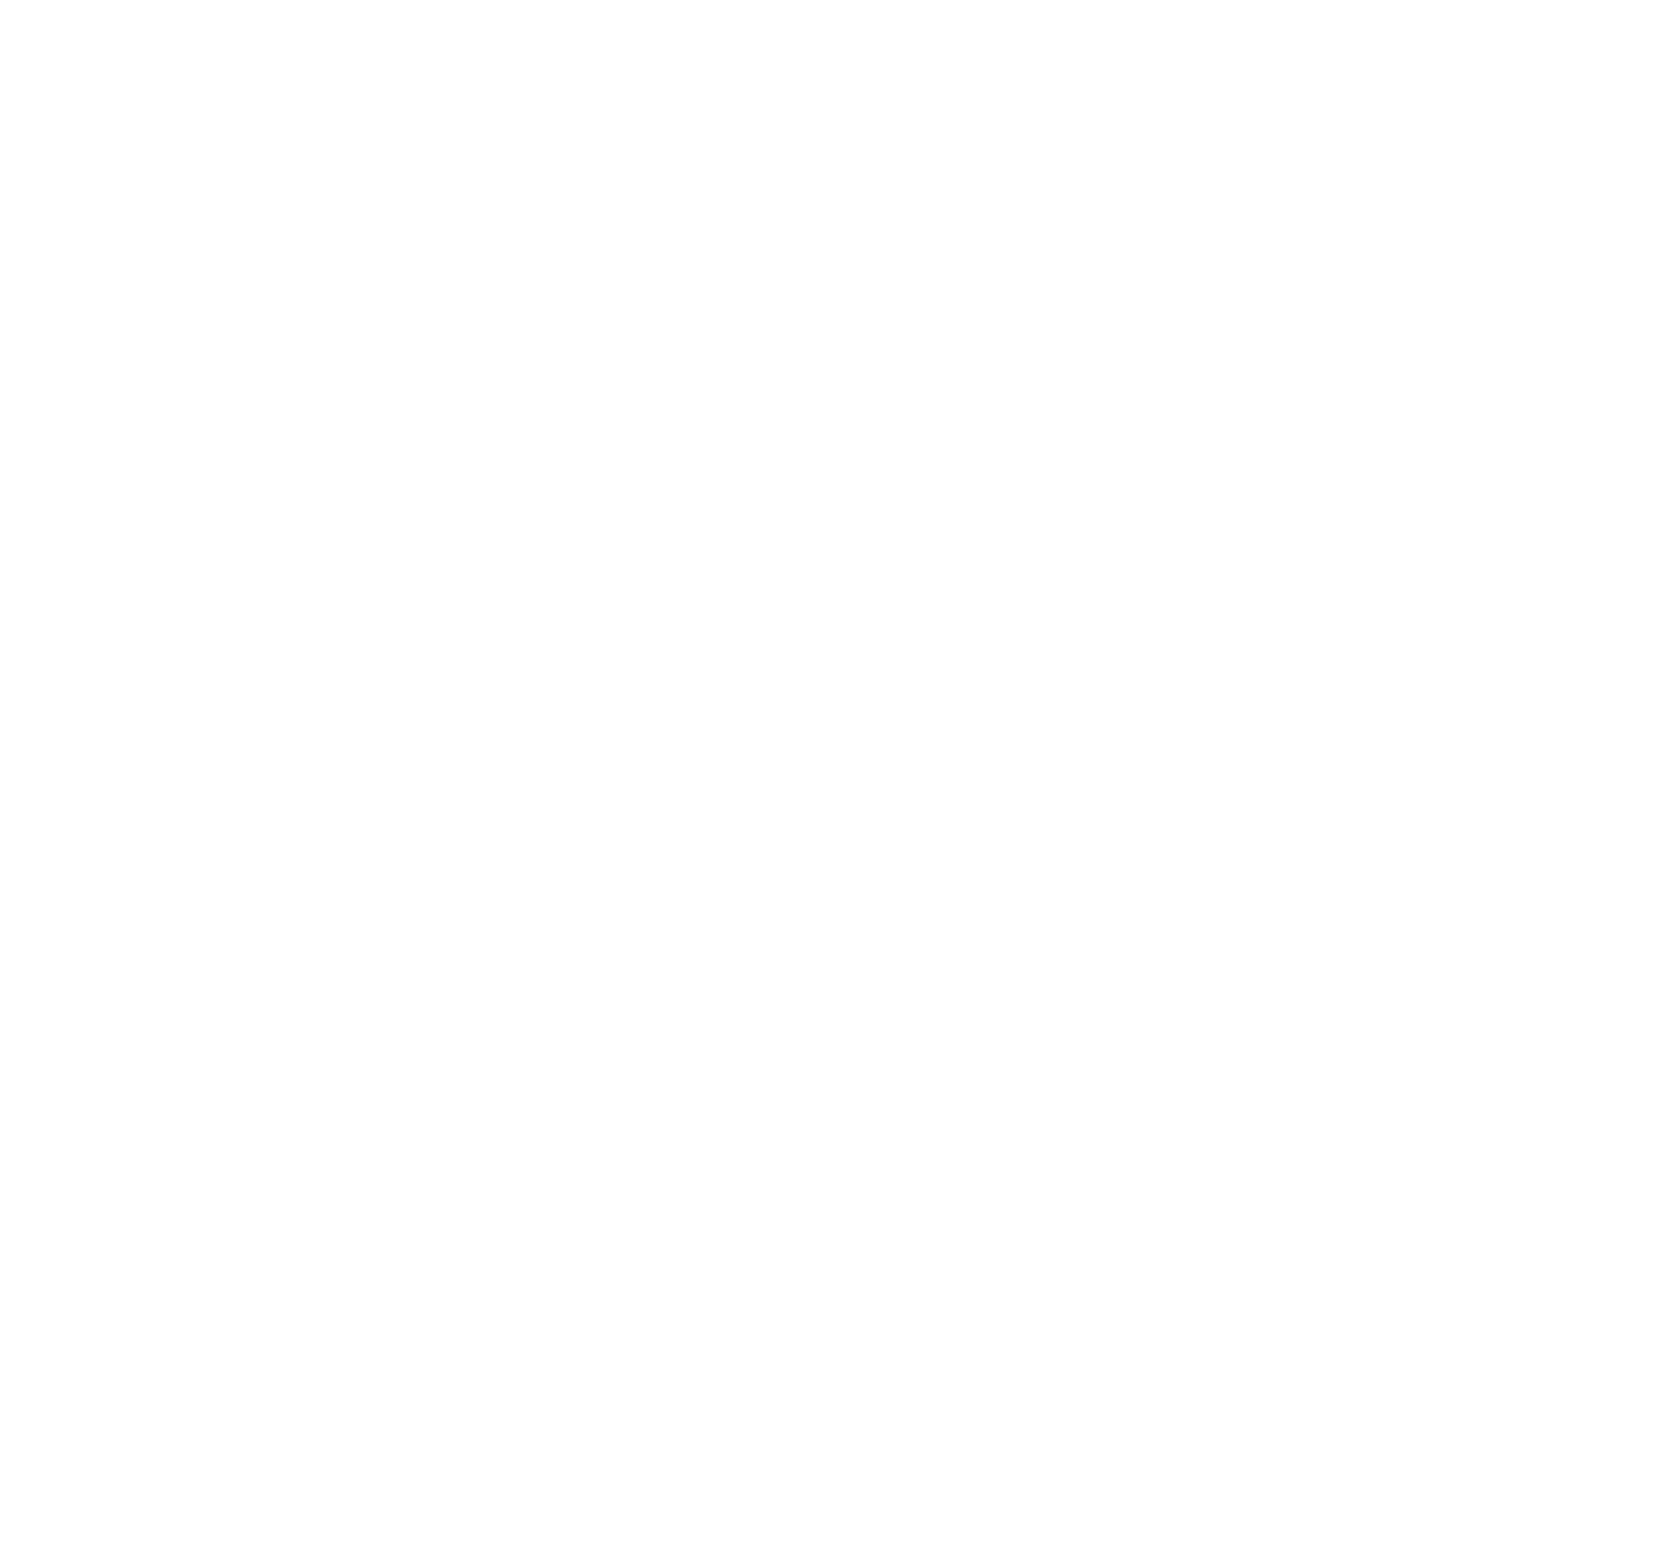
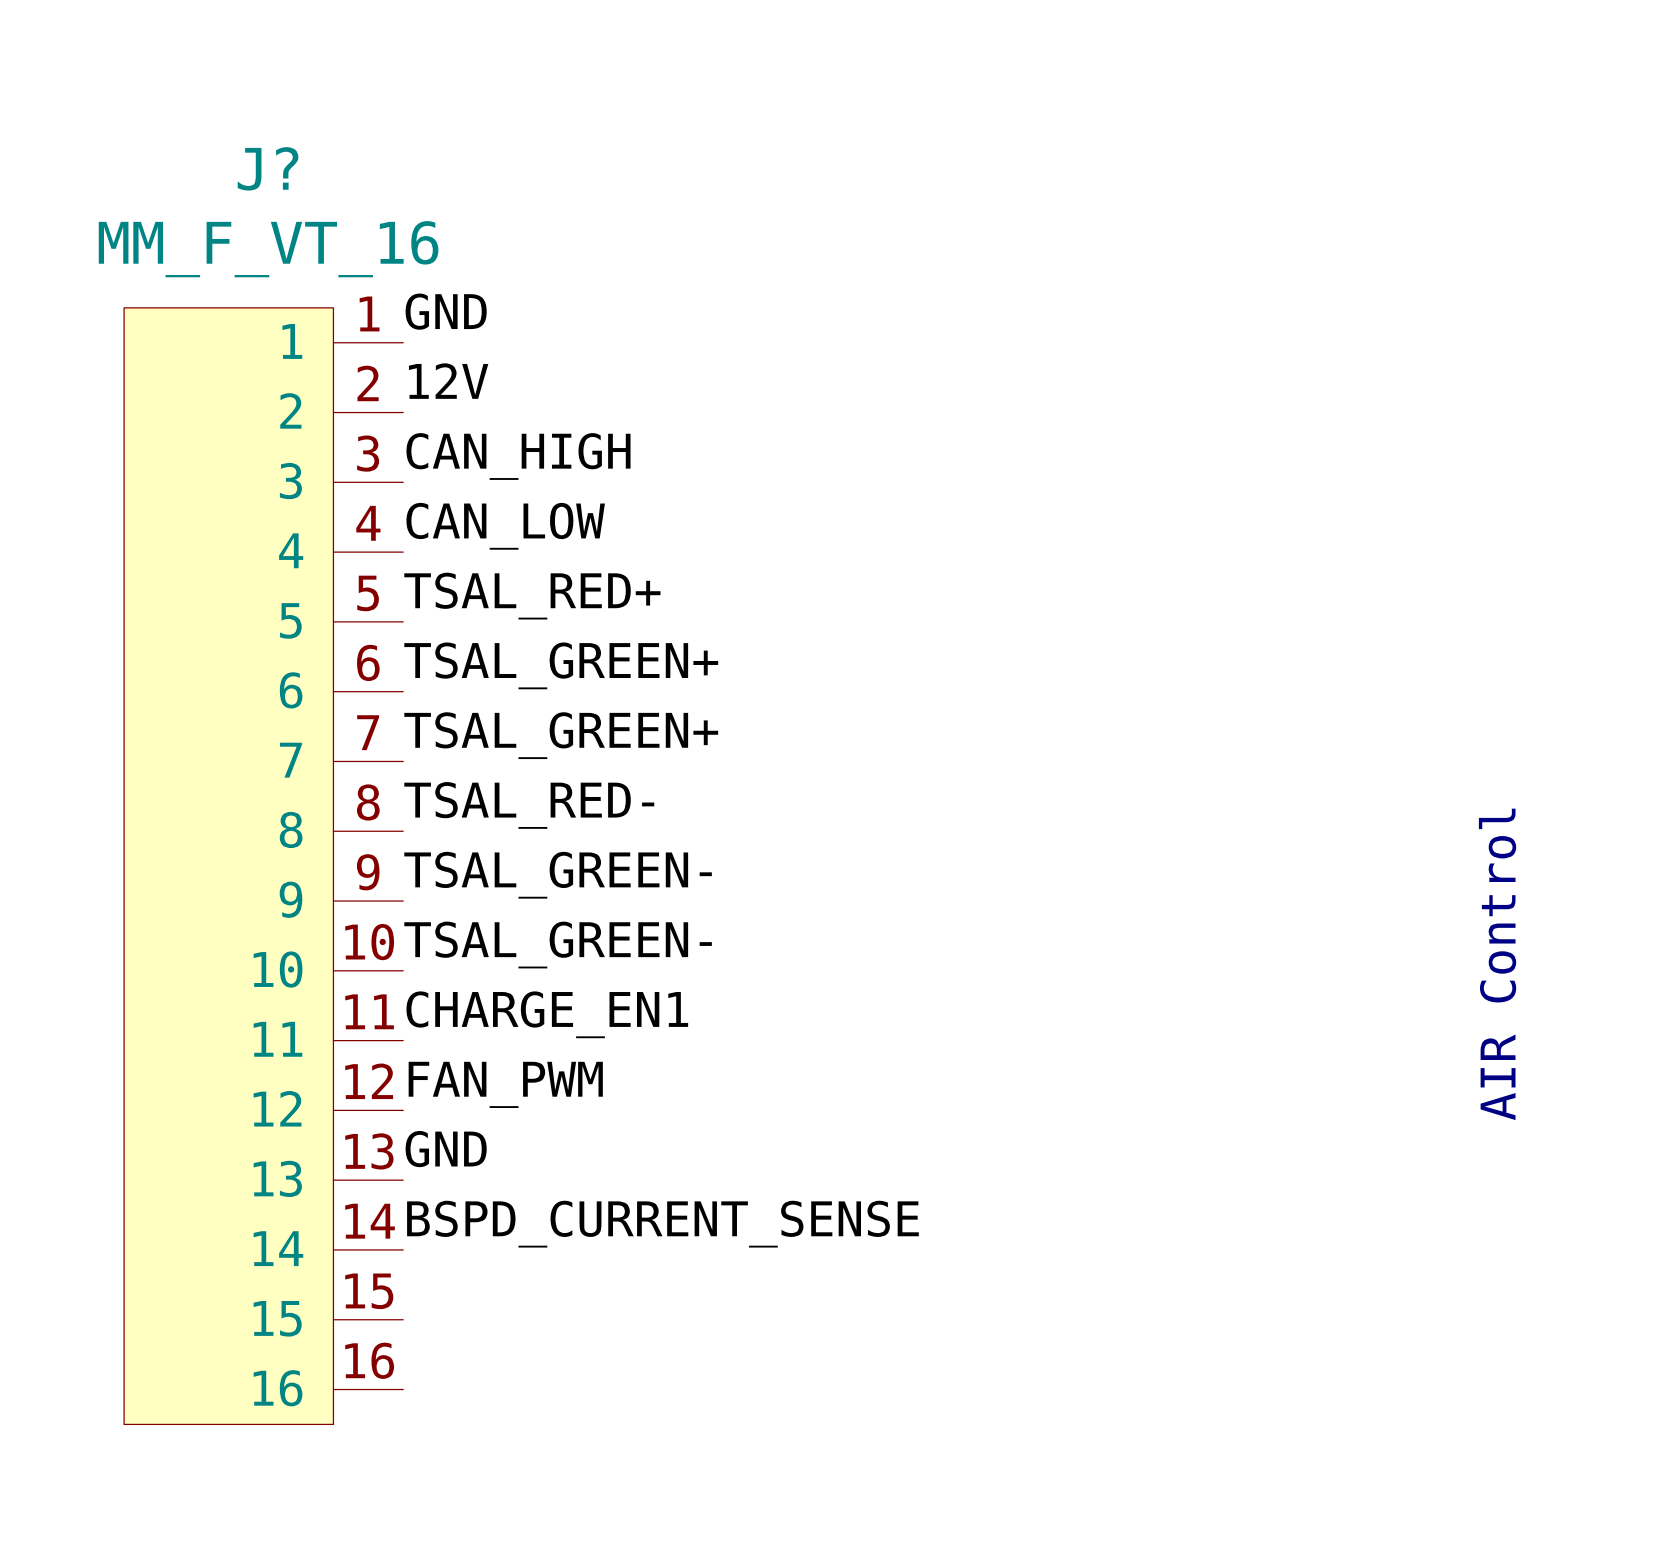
label: none -> GND (446, 311)
label: none -> 12V (448, 381)
label: none -> CAN_HIGH (518, 456)
label: none -> CAN_LOW (505, 526)
label: none -> TSAL_RED+ (532, 596)
label: none -> TSAL_GREEN+ (561, 665)
label: none -> TSAL_GREEN+ (561, 735)
label: none -> TSAL_RED- (529, 805)
J?: none -> MM_F_VT_16 (263, 866)
label: none -> TSAL_GREEN- (558, 875)
label: none -> TSAL_GREEN- (558, 945)
text: none -> AIR Control (1497, 964)
label: none -> CHARGE_EN1 (547, 1014)
label: none -> FAN_PWM (505, 1084)
label: none -> GND (446, 1149)
label: none -> BSPD_CURRENT_SENSE (662, 1224)

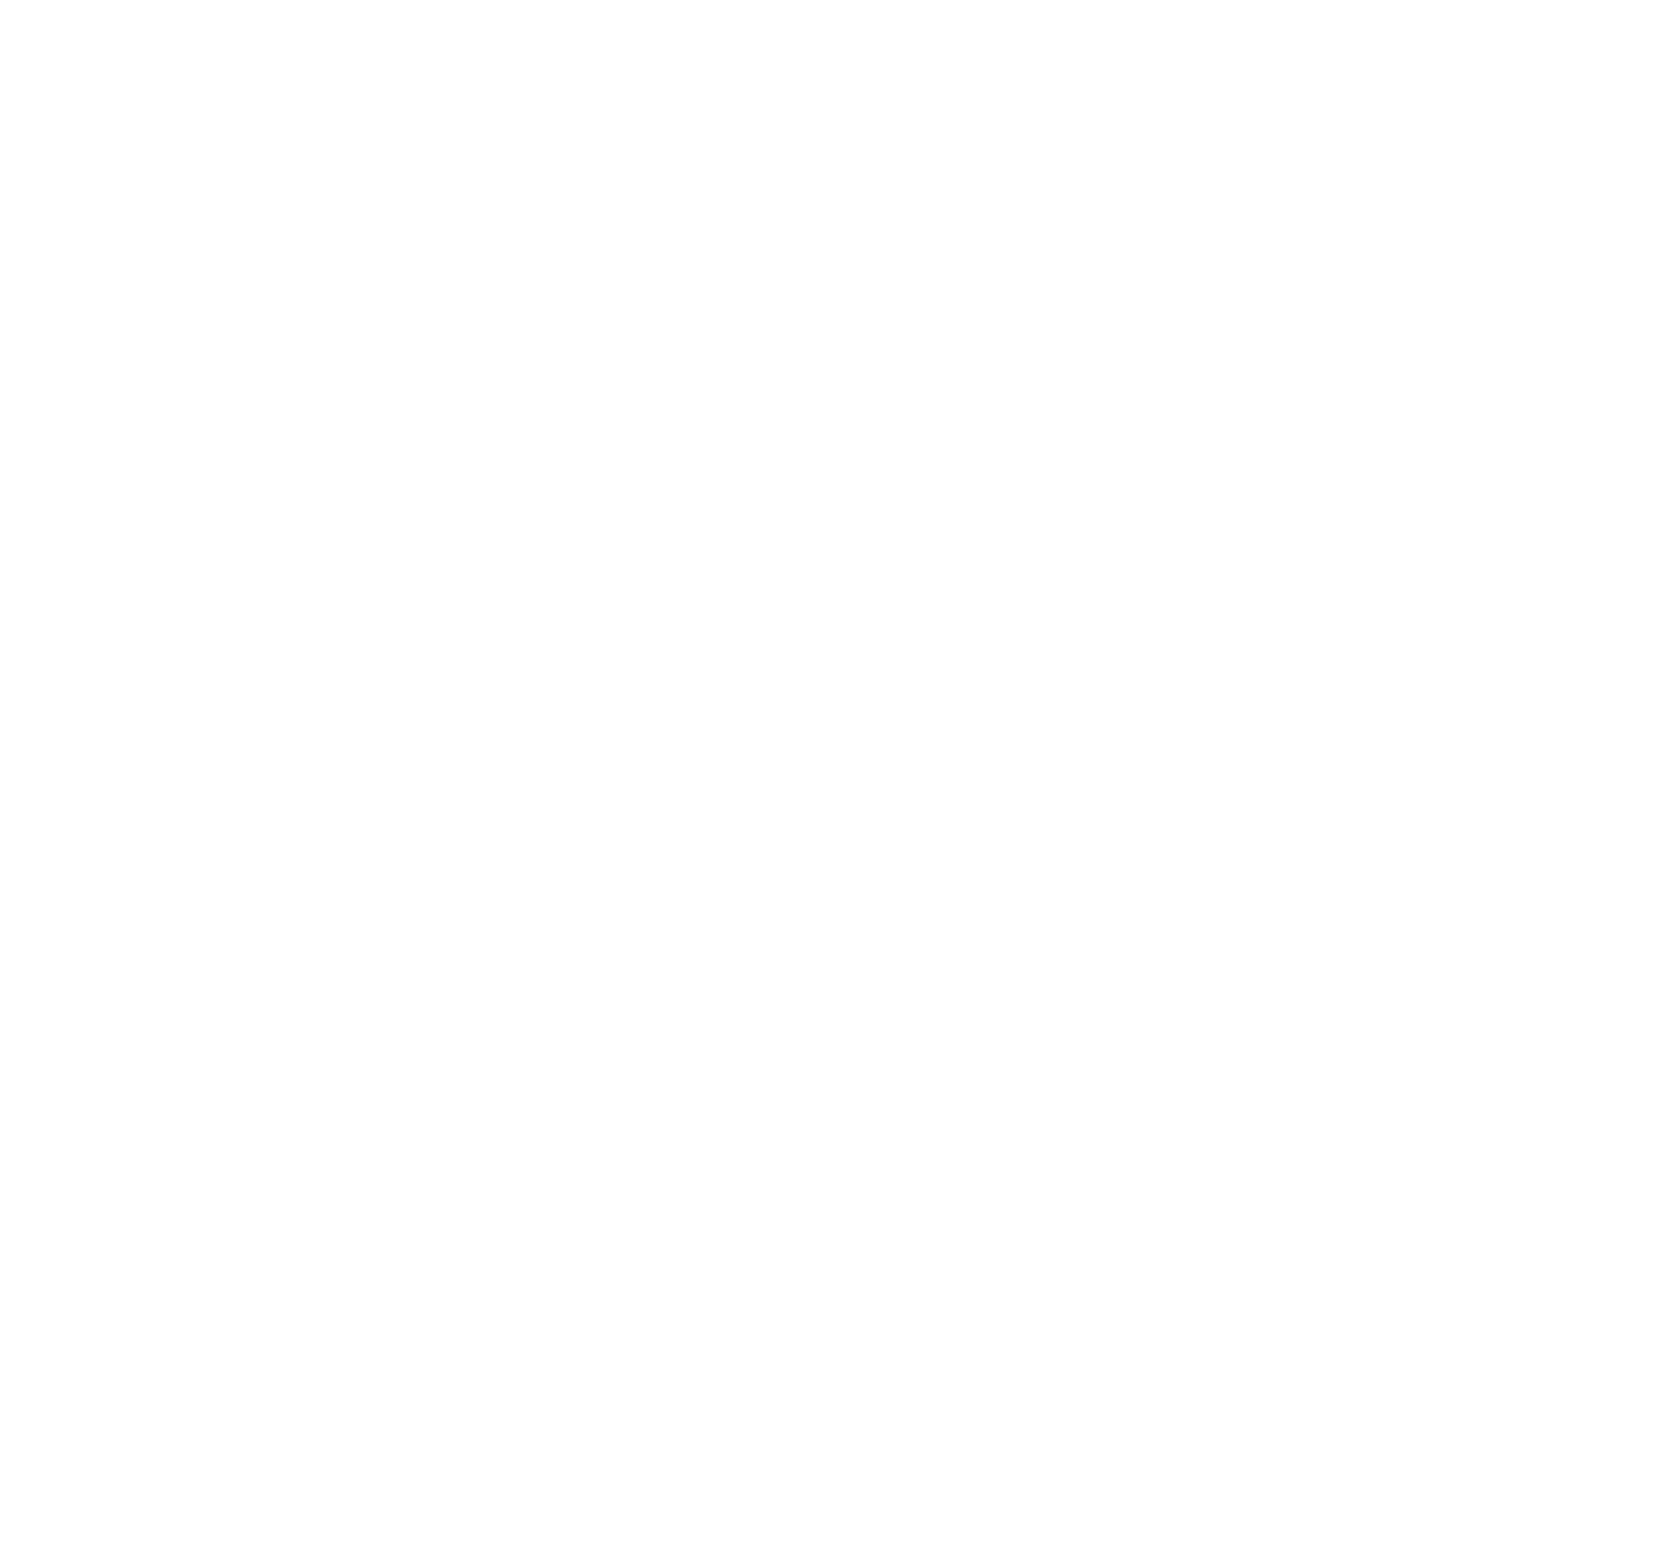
label: GND (446, 311) -> none
label: 12V (448, 381) -> none
label: CAN_HIGH (518, 456) -> none
label: CAN_LOW (505, 526) -> none
label: TSAL_RED+ (532, 596) -> none
label: TSAL_GREEN+ (561, 665) -> none
label: TSAL_GREEN+ (561, 735) -> none
label: TSAL_RED- (529, 805) -> none
J?: MM_F_VT_16 (263, 866) -> none
label: TSAL_GREEN- (558, 875) -> none
label: TSAL_GREEN- (558, 945) -> none
text: AIR Control (1497, 964) -> none
label: CHARGE_EN1 (547, 1014) -> none
label: FAN_PWM (505, 1084) -> none
label: GND (446, 1149) -> none
label: BSPD_CURRENT_SENSE (662, 1224) -> none

